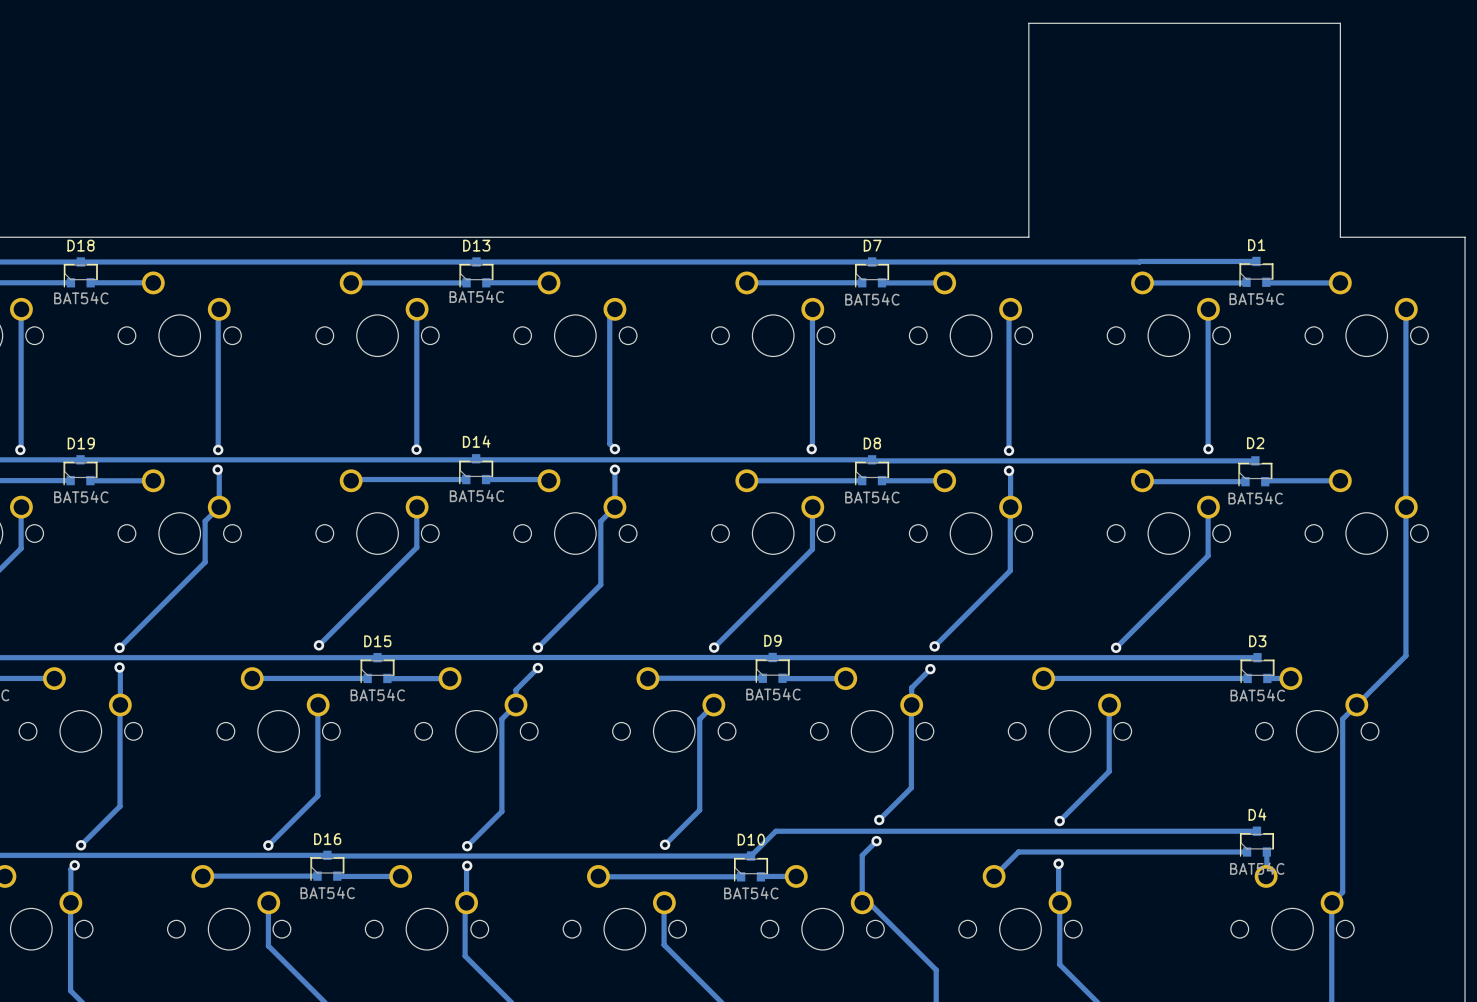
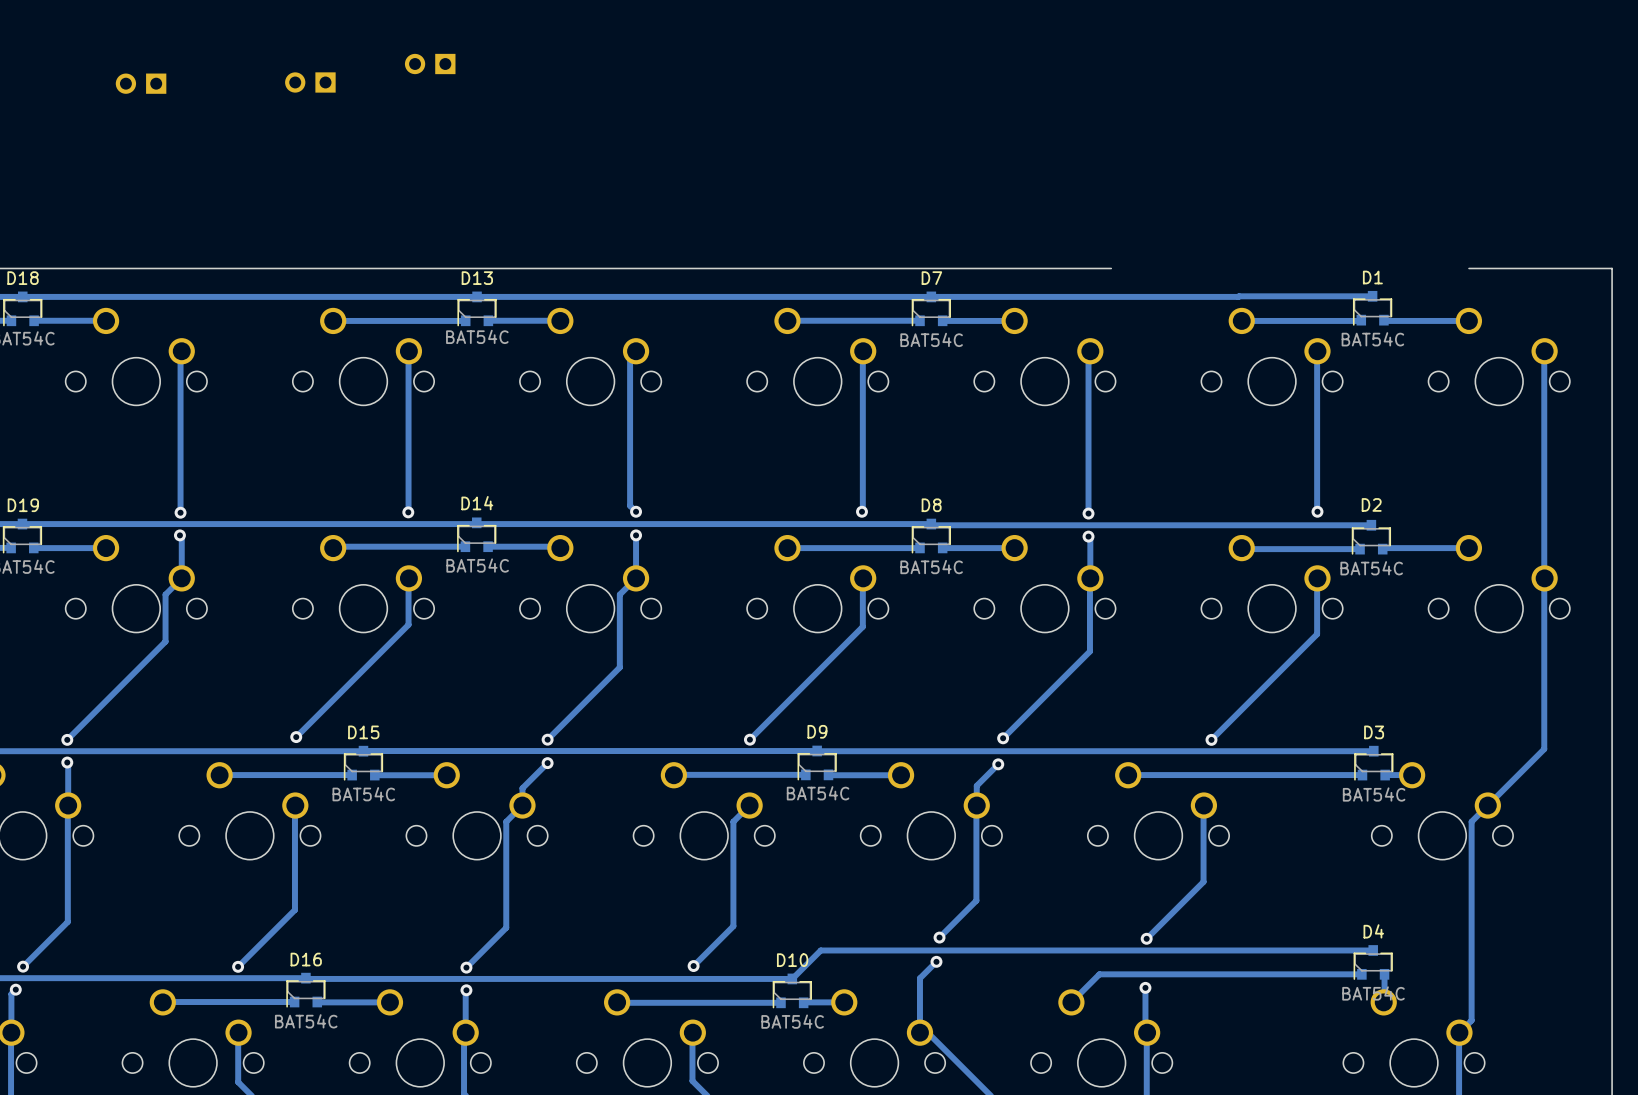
part: none -> (430, 64)
part: none -> (310, 82)
part: none -> (141, 83)
board edge: (1340, 237) (1340, 23) (1028, 23) (1028, 237) -> none

